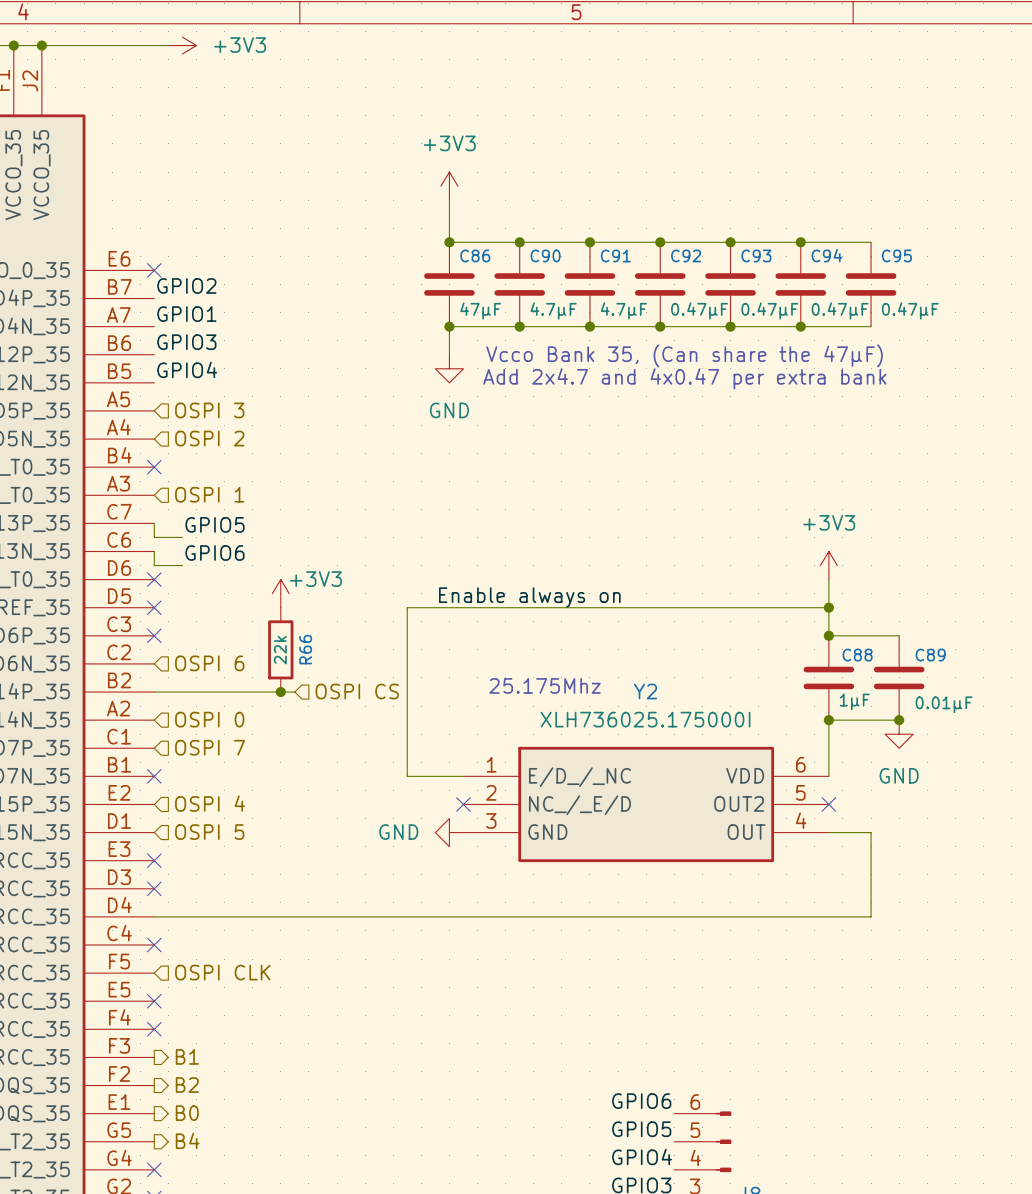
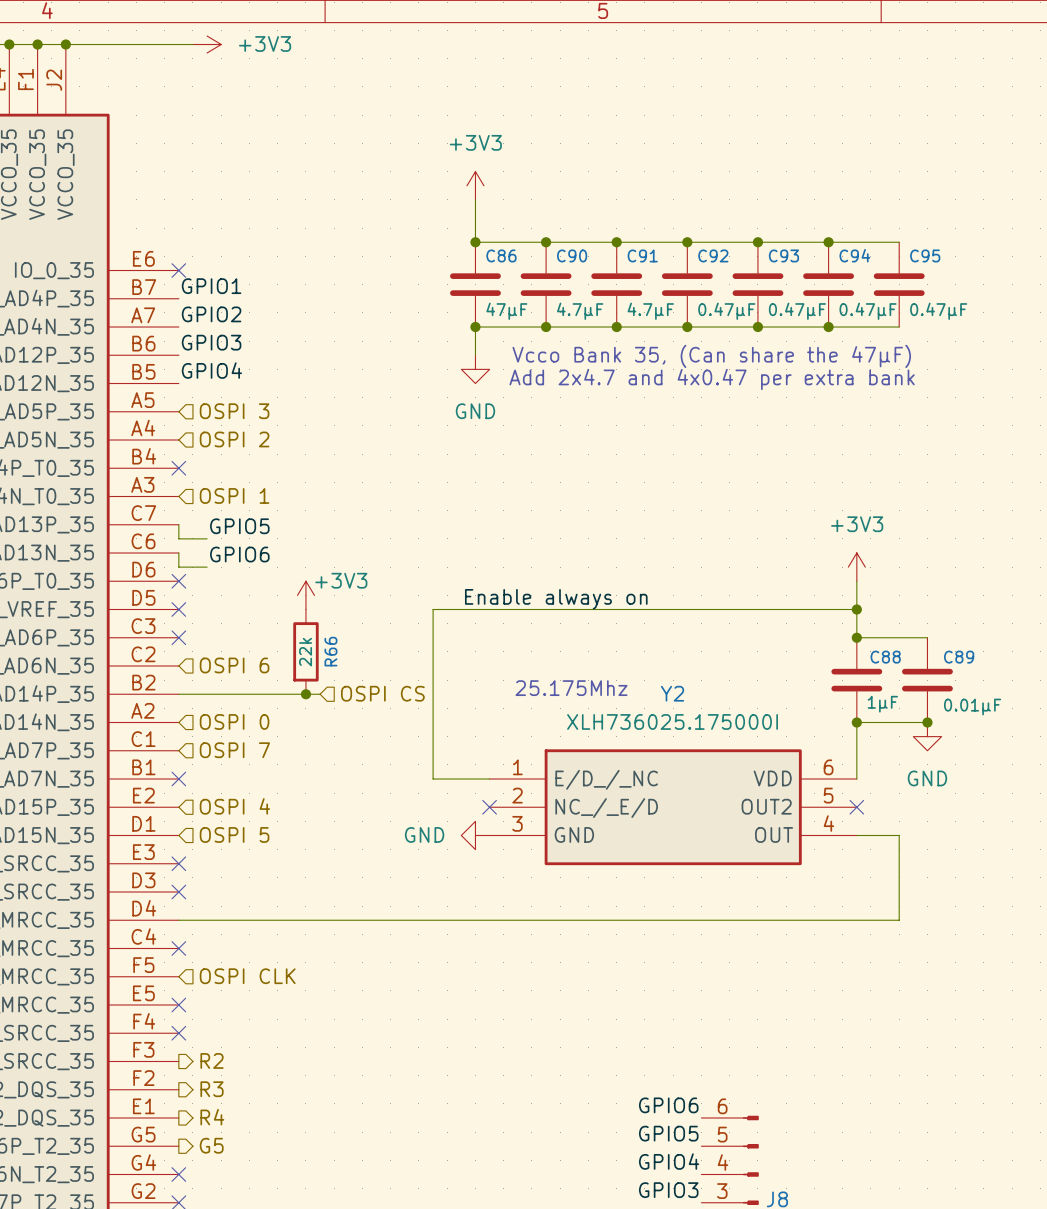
label: GPIO2 (186, 285) -> GPIO1 (211, 286)
label: GPIO1 (186, 314) -> GPIO2 (211, 314)
hierarchical label: B1 (187, 1056) -> R2 (212, 1060)
hierarchical label: B2 (187, 1085) -> R3 (212, 1089)
hierarchical label: B0 (187, 1113) -> R4 (212, 1117)
hierarchical label: B4 (187, 1140) -> G5 (211, 1145)

